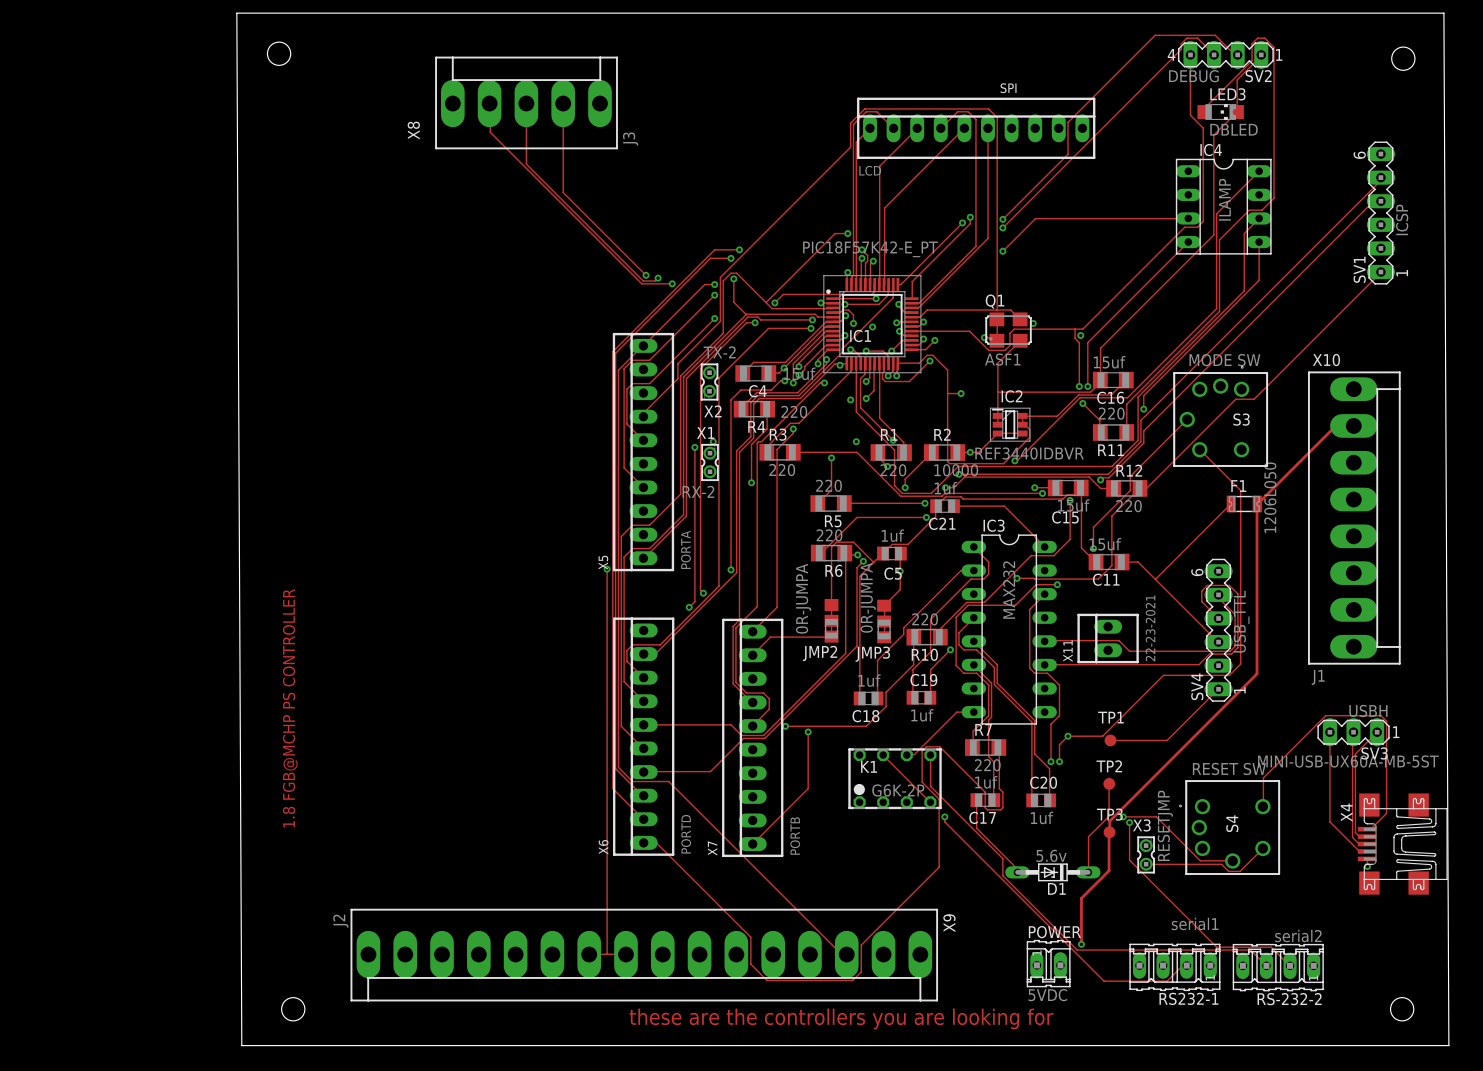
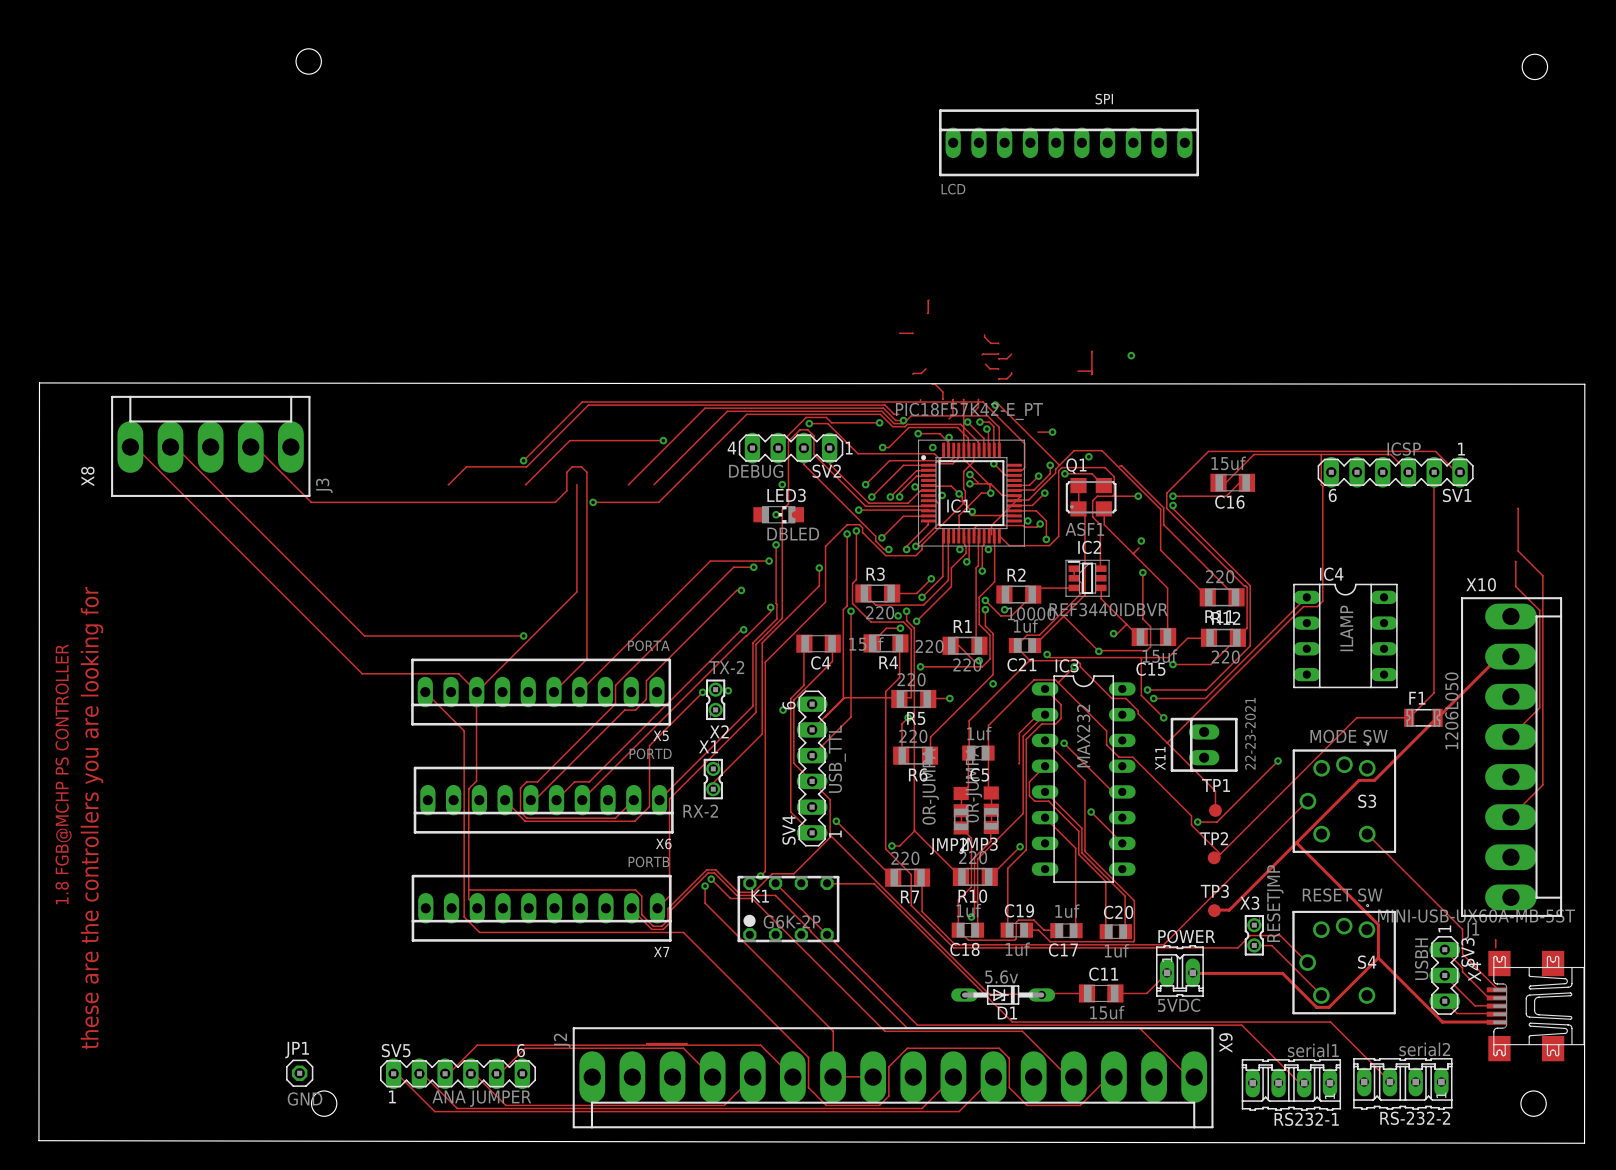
board edge: (236, 13) (1443, 13) (1448, 1045) (241, 1045) (236, 13) -> (39, 382) (38, 1140) (1584, 1143) (1584, 384) (39, 382)
track: (1190, 54) (1190, 115) (1203, 128) (1203, 221) (1197, 227) (1184, 227) (1082, 329) (1014, 329) (1009, 333) (1009, 345) (1004, 350) (988, 350) (969, 331) (911, 331) -> none
track: (1214, 54) (1197, 38) (1186, 38) (1181, 43) (1181, 49) (1002, 227) -> none
SV2 position: (1225, 54) -> (791, 448)
track: (1237, 54) (1234, 54) (1215, 35) (1155, 35) (1067, 122) (1067, 154) (1002, 219) -> none
track: (1261, 54) (1237, 79) (1237, 111) (1213, 135) (1213, 234) (1100, 348) (1099, 382) (1090, 392) (997, 392) -> none
X8 position: (526, 102) -> (210, 446)
track: (489, 103) (490, 132) (641, 283) (672, 283) -> none
track: (526, 103) (526, 164) (643, 280) (655, 280) (658, 278) -> none
track: (563, 103) (563, 192) (646, 275) -> none
track: (1204, 112) (1204, 108) (1252, 60) (1252, 43) (1257, 38) (1264, 38) (1274, 47) (1274, 198) (1261, 210) (1249, 210) (1219, 239) (1219, 311) (1126, 404) (1126, 432) -> none
LED3 position: (1220, 112) -> (778, 514)
track: (870, 128) (856, 142) (856, 284) -> none
track: (893, 128) (876, 111) (866, 111) (853, 124) (853, 275) (851, 284) -> none
track: (917, 128) (879, 166) (879, 284) -> none
track: (940, 128) (957, 111) (968, 111) (975, 119) (975, 246) (919, 302) (911, 303) -> none
track: (964, 128) (884, 208) (883, 284) -> none
track: (987, 128) (987, 238) (918, 307) (911, 307) -> none
SV1 footprint: [1366, 141, 1396, 285] -> [1317, 456, 1474, 488]
track: (1259, 171) (1216, 213) (1216, 308) (1127, 397) (1080, 397) (1014, 460) -> none
track: (1380, 177) (1380, 180) (1140, 420) (1140, 441) (1108, 474) (958, 474) -> none
track: (1380, 201) (1373, 201) (1143, 431) (1143, 443) (1109, 477) (1102, 477) (1100, 479) -> none
IC4 position: (1223, 206) -> (1345, 635)
track: (970, 217) (970, 223) (912, 281) (911, 298) -> none
via: (970, 217) -> none
track: (1188, 218) (1035, 218) (1002, 251) -> none
track: (1259, 218) (1244, 233) (1244, 290) (1138, 397) (1138, 440) (1111, 466) (958, 466) (931, 493) (902, 493) (894, 485) (894, 450) (856, 411) (856, 363) -> none
via: (1002, 219) -> none
SV1 value position: ICSP (1402, 219) -> ICSP (1404, 449)
track: (962, 222) (900, 284) (897, 284) -> none
via: (962, 222) -> none
via: (1002, 227) -> none
track: (847, 233) (835, 233) (766, 302) -> none
via: (847, 233) -> none
track: (1188, 242) (1087, 342) (1087, 386) -> none
track: (1259, 242) (1259, 280) (1143, 395) (1143, 409) -> none
track: (739, 249) (714, 249) (612, 351) (612, 788) (643, 819) -> none
via: (739, 249) -> none
track: (861, 249) (867, 255) (865, 263) (865, 284) -> none
via: (861, 249) -> none
via: (1002, 251) -> none
track: (731, 258) (710, 258) (615, 353) (615, 768) (643, 795) -> none
via: (731, 258) -> none
track: (861, 258) (860, 284) -> none
via: (861, 258) -> none
track: (873, 261) (870, 264) (870, 284) -> none
via: (873, 261) -> none
SV1 name position: SV1 (1359, 269) -> SV1 (1457, 495)
via: (847, 272) -> none
track: (1380, 272) (1254, 399) (1235, 399) (1146, 488) (1139, 488) (1111, 516) (1111, 565) (1098, 579) (1017, 578) -> none
via: (646, 275) -> none
via: (658, 278) -> none
track: (733, 278) (733, 302) (746, 314) -> none
via: (733, 278) -> none
via: (672, 283) -> none
track: (714, 284) (704, 284) (618, 370) (618, 767) (632, 781) (668, 781) (841, 954) (846, 954) -> none
via: (714, 284) -> none
track: (874, 284) (871, 294) (783, 294) (774, 302) -> none
track: (888, 284) (888, 295) (878, 304) (844, 304) -> none
track: (893, 284) (893, 297) (798, 395) (757, 395) (750, 402) (750, 436) (736, 450) (736, 572) (655, 654) (643, 654) -> none
track: (714, 295) (649, 360) (632, 360) (624, 368) (624, 467) (643, 487) -> none
via: (714, 295) -> none
track: (832, 298) (876, 298) -> none
via: (876, 298) -> none
via: (774, 302) -> none
via: (820, 302) -> none
via: (844, 304) -> none
via: (898, 304) -> none
track: (832, 307) (772, 308) (736, 273) (731, 273) (723, 280) (723, 333) (680, 375) (680, 494) (649, 525) (632, 525) (621, 536) (621, 726) (643, 748) -> none
track: (997, 310) (997, 117) (988, 108) (864, 108) (850, 123) (850, 147) (720, 277) (720, 321) (677, 363) (677, 378) (643, 412) (643, 416) -> none
track: (832, 312) (848, 310) (853, 314) (853, 323) -> none
track: (845, 315) (840, 321) (825, 322) (785, 362) (753, 362) (742, 373) -> none
via: (845, 315) -> none
track: (832, 317) (818, 317) (815, 314) (746, 314) (683, 377) (683, 514) (649, 548) (632, 548) (624, 557) (624, 681) (643, 701) -> none
track: (911, 317) (920, 317) (927, 310) (1010, 310) (1020, 319) -> none
track: (714, 318) (649, 383) (632, 383) (626, 389) (626, 424) (643, 440) -> none
via: (714, 318) -> none
track: (812, 319) (760, 319) (757, 317) (747, 317) (686, 378) (686, 516) (643, 558) -> none
via: (812, 319) -> none
track: (755, 322) (746, 322) (700, 368) (700, 590) (703, 593) -> none
via: (755, 322) -> none
via: (896, 322) -> none
via: (923, 322) -> none
via: (853, 323) -> none
IC1 position: (872, 324) -> (971, 493)
track: (832, 326) (825, 327) (779, 373) (768, 373) -> none
via: (872, 327) -> none
track: (811, 328) (768, 328) (718, 377) (718, 402) -> (928, 505) (865, 506) (813, 454) (813, 435) (807, 429) (800, 429) (788, 441)
via: (811, 328) -> none
track: (1075, 329) (1075, 338) (1079, 342) (1079, 386) -> none
Q1 position: (1008, 330) -> (1091, 497)
track: (832, 331) (825, 331) (793, 363) (793, 382) -> none
via: (899, 331) -> none
track: (832, 335) (825, 336) (798, 363) (798, 366) -> none
via: (844, 335) -> none
via: (1080, 335) -> none
via: (984, 337) -> none
via: (923, 339) -> none
track: (911, 340) (902, 340) (891, 351) -> none
track: (934, 340) (925, 349) (911, 349) -> none
via: (934, 340) -> none
track: (1020, 340) (997, 363) (997, 424) -> none
track: (832, 345) (825, 345) (798, 375) -> none
track: (832, 349) (827, 350) (818, 359) (818, 363) -> none
via: (850, 349) -> none
track: (866, 351) (883, 351) (888, 356) (888, 363) -> none
via: (866, 351) -> none
via: (891, 351) -> none
track: (826, 359) (826, 363) (797, 392) (756, 392) (741, 409) -> none
via: (826, 359) -> none
track: (929, 360) (909, 381) (885, 381) (882, 378) (883, 363) -> none
via: (929, 360) -> none
via: (818, 363) -> none
track: (846, 363) (835, 363) (800, 398) (759, 398) (753, 404) (753, 438) (739, 452) (739, 620) (733, 626) (733, 683) (752, 702) -> none
track: (851, 363) (851, 370) (798, 423) (790, 423) (767, 446) (766, 452) -> none
track: (865, 363) (864, 374) (860, 378) (860, 407) (885, 432) -> none
track: (874, 363) (874, 390) (866, 398) -> none
via: (840, 365) -> none
via: (798, 366) -> none
via: (784, 368) -> none
track: none -> (995, 405) (999, 405) (1059, 465)
via: none -> (995, 405)
C4 position: (755, 373) -> (818, 643)
via: (798, 375) -> none
via: (888, 375) -> none
track: (896, 375) (898, 363) (919, 363) (927, 355) (932, 355) (947, 370) (947, 461) (949, 463) (1003, 463) (1029, 437) (1029, 429) -> (1236, 597) (1163, 524) (1163, 507) (1127, 471)
via: (896, 375) -> none
track: none -> (898, 414) (894, 414) (884, 405) (588, 405) (526, 466) (466, 466) (448, 484)
track: (784, 380) (780, 380) (771, 390) (740, 390) (731, 399) (731, 569) -> none
via: (784, 380) -> none
C16 position: (1113, 380) -> (1232, 482)
track: (1126, 380) (1111, 394) (1078, 394) (1057, 416) (1022, 415) (1022, 424) -> none
via: (866, 381) -> none
X2 position: (709, 382) -> (715, 699)
via: (793, 382) -> none
track: (820, 382) (761, 441) (757, 443) (757, 606) (735, 627) (735, 682) (746, 693) (763, 693) (769, 698) (769, 709) (752, 726) -> (898, 420) (895, 420) (883, 408) (705, 408) (628, 484)
track: none -> (967, 422) (983, 438) (984, 450)
via: none -> (967, 422)
track: none -> (979, 422) (989, 422) (993, 426) (994, 450)
via: none -> (979, 422)
track: none -> (809, 423) (827, 423) (857, 453) (934, 453) (941, 460) (950, 460) (953, 457) (953, 450)
via: none -> (809, 423)
track: none -> (879, 422) (831, 422) (826, 417) (806, 417) (778, 445) (778, 448)
via: none -> (879, 422)
via: (1079, 386) -> none
via: (1087, 386) -> none
track: none -> (986, 429) (989, 450)
via: none -> (986, 429)
track: none -> (918, 433) (939, 433) (948, 442) (948, 450)
via: none -> (918, 433)
via: (850, 399) -> none
track: none -> (663, 440) (569, 440) (525, 484)
via: none -> (663, 440)
track: (1082, 403) (1099, 420) (1100, 432) -> none
via: (1082, 403) -> none
track: none -> (130, 447) (136, 447) (362, 673) (458, 673) (476, 692)
track: none -> (170, 447) (176, 447) (364, 635) (523, 635)
track: none -> (250, 447) (256, 447) (311, 502) (555, 502) (566, 490) (566, 472) (572, 466) (581, 466) (586, 472) (586, 659) (553, 692)
track: none -> (882, 447) (888, 447) (908, 427) (957, 427) (968, 438) (968, 450)
via: none -> (882, 447)
via: none -> (932, 447)
track: none -> (803, 448) (803, 464) (875, 536) (875, 540) (884, 549) (888, 549)
track: none -> (829, 448) (830, 464) (868, 503) (908, 503) (920, 490) (928, 490)
R4 position: (754, 409) -> (886, 643)
track: (767, 409) (767, 428) (751, 444) (751, 482) -> none
via: (1143, 409) -> none
track: none -> (958, 450) (958, 458) (952, 463) (939, 463) (936, 460) (889, 460) (865, 484)
track: none -> (974, 450) (973, 461) (963, 471) (965, 501) (922, 544) (922, 549) (915, 555) (885, 555) (862, 532) (862, 527) (859, 524) (847, 524) (825, 546) (825, 601) (765, 662) (765, 871) (760, 876)
track: none -> (979, 450) (978, 442) (960, 424) (907, 424) (905, 426) (892, 426) (880, 414) (746, 414) (658, 502) (593, 502)
track: none -> (999, 450) (999, 427) (987, 415) (911, 415) (903, 423) (894, 423) (881, 411) (727, 411) (654, 484)
track: none -> (1321, 454) (1322, 601) (1317, 606) (1303, 606) (1167, 742)
via: none -> (1088, 456)
S3 position: (1220, 416) -> (1344, 797)
track: none -> (523, 460) (582, 402) (983, 402) (1024, 443) (1024, 467) (1022, 469) (1014, 470)
via: none -> (523, 460)
track: (1187, 419) (1130, 476) (1130, 490) (1093, 527) (1093, 548) -> none
track: none -> (993, 463) (1005, 475) (1014, 475)
via: none -> (993, 463)
track: none -> (928, 465) (903, 465) (871, 496)
track: none -> (1050, 465) (1050, 473) (1034, 490) (1014, 490)
via: none -> (1050, 465)
IC2 position: (1010, 424) -> (1087, 578)
track: (1353, 425) (1335, 426) (1257, 504) (1257, 673) (1109, 821) (1109, 831) -> (1510, 656) (1498, 656) (1374, 780) (1359, 780) (1229, 910) (1214, 910)
track: (793, 428) (793, 433) (777, 449) (777, 607) (752, 631) -> none
via: (793, 428) -> none
track: none -> (928, 470) (916, 470) (890, 496)
track: none -> (1408, 472) (1390, 454) (1254, 454) (1226, 482) (1218, 482)
track: none -> (1459, 472) (1456, 472) (1435, 451) (1208, 451) (1166, 493) (1166, 508) (1247, 587) (1247, 628) (1210, 664) (1172, 664)
track: none -> (1064, 473) (1091, 473) (1103, 485)
via: none -> (1064, 473)
via: none -> (969, 474)
R11 position: (1113, 432) -> (1222, 597)
track: none -> (928, 475) (916, 476) (899, 493) (899, 496)
track: none -> (1038, 476) (1029, 485) (1014, 485)
via: none -> (1038, 476)
track: (1022, 433) (997, 433) (978, 452) (957, 452) -> none
track: none -> (969, 483) (990, 483) (1002, 495) (1014, 495)
via: none -> (969, 483)
via: (893, 440) -> none
track: none -> (1246, 482) (1239, 483) (1226, 496) (1172, 496)
track: none -> (576, 484) (576, 591) (476, 692) (476, 781) (468, 788) (468, 899) (477, 908)
via: none -> (865, 484)
via: (856, 441) -> none
track: none -> (928, 485) (951, 486) (959, 493)
track: none -> (1078, 485) (1078, 508) (1084, 515) (1084, 595) (1034, 645)
via: none -> (915, 486)
track: (694, 447) (694, 586) -> (819, 568) (819, 585) (762, 642)
via: (694, 447) -> none
track: none -> (990, 493) (981, 493) (959, 515) (958, 536)
via: none -> (990, 493)
track: none -> (1044, 493) (1032, 505) (1014, 505)
via: none -> (1044, 493)
track: (1199, 449) (1240, 490) (1240, 664) (1229, 675) (1163, 675) (1102, 736) (1067, 736) (1059, 744) (1059, 761) -> none
via: none -> (959, 493)
via: none -> (942, 495)
track: none -> (1113, 495) (1138, 496)
X5 rotation: 0° (643, 452) -> 90° counterclockwise (541, 692)
X5 position: (643, 452) -> (541, 692)
R3 position: (780, 452) -> (877, 593)
track: (793, 452) (857, 452) (900, 496) (941, 496) (944, 493) (1042, 493) -> none
R1 position: (891, 452) -> (965, 645)
R2 position: (944, 452) -> (1018, 594)
via: (970, 452) -> none
via: none -> (1138, 496)
via: none -> (1172, 496)
via: none -> (871, 496)
via: none -> (890, 496)
via: none -> (899, 496)
track: none -> (928, 500) (935, 500) (939, 503) (939, 523) (915, 546)
track: none -> (1014, 500) (1028, 500) (1055, 473) (1055, 469) (1074, 450) (1101, 450) (1160, 509) (1160, 550) (1207, 597)
via: none -> (593, 502)
track: (831, 457) (831, 489) (817, 503) -> none
via: (831, 457) -> none
track: (718, 459) (718, 586) (660, 644) (632, 644) (626, 650) (626, 661) (643, 677) -> (788, 503) (782, 510) (782, 618) (756, 644) (756, 712) (669, 798) (669, 896) (657, 908)
via: (1014, 460) -> none
track: none -> (1172, 505) (1172, 508) (1250, 585) (1250, 645) (1206, 690) (1147, 690)
via: none -> (1172, 505)
X1 position: (710, 462) -> (713, 779)
track: none -> (1103, 508) (1104, 524) (1167, 588) (1168, 636)
track: none -> (1517, 508) (1518, 551) (1542, 575) (1542, 784) (1510, 817)
track: none -> (858, 510) (928, 510)
via: none -> (858, 510)
track: none -> (1014, 510) (1036, 510) (1046, 520) (1046, 539)
track: none -> (969, 513) (1014, 515)
via: none -> (776, 514)
track: none -> (928, 515) (903, 516) (881, 537)
via: none -> (1027, 520)
via: (958, 474) -> none
track: none -> (928, 520) (928, 524) (906, 546) (906, 549)
track: none -> (1040, 524) (1037, 527) (976, 525) (974, 527) (974, 536)
via: none -> (1040, 524)
via: (1100, 479) -> none
via: (751, 482) -> none
via: none -> (856, 530)
track: none -> (847, 534) (847, 605) (843, 609) (843, 698) (812, 729)
via: none -> (847, 534)
via: (905, 487) -> none
track: (945, 487) (954, 487) (964, 477) (1089, 477) (1100, 488) (1113, 488) -> none
via: (945, 487) -> none
track: (1034, 487) (1055, 487) -> none
via: (1034, 487) -> none
C15 position: (1068, 487) -> (1153, 636)
track: none -> (943, 536) (942, 576) (922, 597)
track: none -> (948, 536) (948, 580) (923, 605) (875, 605) (863, 593)
track: none -> (963, 536) (966, 553) (951, 568) (951, 586) (916, 621)
track: none -> (968, 536) (969, 559) (966, 561)
track: none -> (979, 536) (978, 565) (976, 568) (976, 642) (979, 645)
track: none -> (984, 536) (982, 571)
track: none -> (994, 536) (994, 581) (979, 597) (979, 624) (989, 635) (989, 659) (982, 666) (920, 666)
track: none -> (999, 536) (1009, 545) (1049, 545) (1058, 536) (1058, 470) (1061, 467) (1105, 467) (1114, 476) (1114, 494) (1097, 496) (1092, 500) (1092, 517) (1100, 524) (1101, 568)
R12 position: (1126, 488) -> (1223, 637)
via: none -> (881, 537)
via: none -> (1046, 539)
track: none -> (776, 544) (776, 618) (752, 642) (752, 706) (659, 800)
via: none -> (776, 544)
via: none -> (915, 546)
track: none -> (1139, 547) (1133, 553)
track: (1070, 500) (1070, 539) (1053, 555) (1031, 555) (984, 602) (966, 602) (940, 628) (940, 637) -> none
via: (1070, 500) -> none
via: none -> (888, 549)
via: none -> (906, 549)
via: none -> (959, 549)
via: none -> (988, 549)
R5 position: (831, 503) -> (913, 699)
track: (924, 503) (844, 503) -> none
via: (924, 503) -> none
track: (1231, 504) (1155, 579) -> none
F1 position: (1244, 504) -> (1423, 717)
C21 position: (945, 506) -> (1025, 645)
track: (953, 506) (1004, 506) (1044, 546) -> none
track: none -> (769, 561) (710, 561) (579, 692)
via: none -> (769, 561)
via: none -> (966, 561)
track: none -> (1515, 561) (1515, 586) (1539, 610) (1539, 707) (1510, 736)
track: none -> (753, 567) (733, 567) (615, 685) (615, 703) (537, 781) (526, 781) (520, 788) (520, 812) (526, 818) (615, 818) (633, 800)
via: none -> (753, 567)
track: (926, 517) (857, 517) (821, 552) (818, 553) -> none
via: (926, 517) -> none
via: none -> (819, 568)
X10 position: (1354, 518) -> (1511, 757)
via: none -> (982, 571)
track: none -> (1142, 572) (1142, 618) (1150, 626) (1150, 646) (1146, 650) (1098, 651) (1063, 616)
via: none -> (1142, 572)
track: none -> (931, 578) (916, 593) (892, 593)
via: none -> (931, 578)
track: none -> (1073, 587) (1039, 588) (1011, 615) (1000, 615) (985, 600)
track: none -> (1101, 588) (1101, 598) (1139, 636)
track: none -> (741, 590) (736, 590) (646, 680) (646, 699) (635, 710) (624, 710) (535, 799) (530, 800)
via: none -> (741, 590)
C11 value position: 15uf (1105, 544) -> 15uf (1107, 1012)
via: none -> (922, 597)
track: none -> (1306, 597) (1205, 698) (1153, 698)
track: (973, 546) (988, 562) (988, 574) (983, 579) (971, 579) (930, 619) (930, 651) (912, 669) (912, 697) -> none
via: none -> (985, 600)
via: (1093, 548) -> none
R6 position: (831, 553) -> (915, 755)
C5 position: (891, 553) -> (978, 753)
track: (900, 553) (900, 589) (884, 605) (884, 637) -> none
track: none -> (770, 607) (770, 612) (582, 800)
via: none -> (770, 607)
track: (857, 554) (846, 554) (844, 553) (845, 653) (763, 735) (741, 735) (731, 724) (643, 724) -> none
via: (857, 554) -> none
track: none -> (985, 609) (985, 625) (993, 633) (993, 674) (930, 737) (930, 755)
via: none -> (985, 609)
via: none -> (1004, 609)
track: none -> (851, 611) (851, 717) (812, 755)
via: none -> (851, 611)
track: none -> (906, 611) (906, 620) (914, 628) (914, 830) (960, 876)
via: none -> (906, 611)
track: (863, 561) (857, 567) (857, 646) (764, 738) (743, 738) (710, 771) (643, 772) -> none
via: (863, 561) -> none
via: none -> (898, 615)
track: (873, 562) (853, 542) (836, 542) (831, 547) (831, 574) -> (856, 530) (856, 579) (852, 583) (852, 603) (871, 622) (903, 622) (911, 629)
track: (1096, 562) (1081, 547) (1081, 488) (1081, 487) (1081, 494) (1067, 494) (1063, 499) (963, 499) (961, 496) (945, 496) (935, 506) (935, 516) (907, 544) (892, 544) (859, 576) (859, 698) -> none
C11 position: (1109, 562) -> (1101, 993)
track: (1122, 562) (1138, 562) (1218, 642) -> none
via: none -> (916, 621)
track: (607, 569) (607, 954) -> none
via: (607, 569) -> none
via: (731, 569) -> none
track: none -> (1126, 624) (1114, 636)
track: (973, 570) (961, 570) (903, 627) (903, 634) (877, 660) (877, 698) -> none
via: (900, 571) -> none
track: none -> (900, 628) (886, 628) (871, 643)
via: none -> (900, 628)
track: none -> (743, 629) (741, 629) (589, 781) (574, 781) (556, 800)
via: none -> (743, 629)
C11 name position: C11 (1106, 579) -> C11 (1103, 974)
via: none -> (523, 635)
track: none -> (1209, 637) (1187, 638) (1168, 657) (1050, 657) (1047, 654)
track: (1057, 584) (1036, 584) (1015, 605) (968, 605) (956, 617) (956, 665) (963, 673) (976, 673) (988, 685) (988, 715) (973, 731) (972, 747) -> none
via: (1057, 584) -> none
track: none -> (804, 643) (803, 685) (790, 698) (790, 812) (812, 832)
track: none -> (832, 643) (832, 661) (793, 700) (793, 763) (830, 799) (830, 835) (989, 994) (1087, 993)
track: none -> (900, 643) (899, 677) (885, 691) (885, 801)
track: none -> (950, 645) (959, 645) (973, 660) (979, 660)
via: (703, 593) -> none
via: none -> (1098, 651)
track: (1044, 594) (1029, 609) (1029, 668) (1034, 673) (1047, 673) (1059, 685) (1059, 715) (1051, 724) (1051, 761) -> none
track: (1218, 594) (1218, 598) (1235, 614) (1235, 646) (1230, 651) (1129, 651) (1118, 640) (1044, 641) -> none
via: none -> (1047, 654)
track: none -> (1141, 657) (1141, 695) (1163, 717)
track: (694, 601) (689, 607) -> (762, 659) (762, 734) (713, 782) (713, 789)
track: none -> (1029, 660) (969, 720) (968, 786) (961, 793) (961, 827) (971, 838) (971, 886) (958, 900) (958, 930) (968, 940) (1014, 940) (1016, 922) (1018, 920) (1034, 920) (1044, 930) (1056, 930)
via: none -> (979, 660)
via: none -> (1172, 664)
via: (689, 607) -> none
via: none -> (920, 666)
track: none -> (1074, 666) (1058, 682)
via: none -> (1074, 666)
track: (973, 617) (958, 632) (958, 644) (963, 649) (976, 649) (994, 667) (994, 684) (1031, 722) (1032, 800) -> none
track: (1218, 618) (1201, 601) (1201, 591) (1207, 585) (1229, 585) (1237, 593) (1237, 647) (1231, 654) (1209, 654) (1198, 664) (1044, 664) -> none
JMP2 position: (831, 620) -> (961, 810)
JMP3 position: (884, 621) -> (991, 810)
via: none -> (993, 683)
track: none -> (1045, 688) (1061, 704) (1061, 718) (1055, 723) (1041, 723) (1026, 739) (1026, 849) (1007, 868) (1007, 930)
IC3 position: (1009, 629) -> (1083, 779)
via: none -> (728, 690)
via: none -> (1147, 690)
SV4 position: (1218, 630) -> (812, 768)
track: none -> (425, 692) (464, 730) (464, 917) (479, 932) (683, 932) (808, 1057) (808, 1087) (826, 1105) (879, 1105) (888, 1096) (888, 1066) (907, 1048) (999, 1048) (1009, 1058) (1009, 1087) (1027, 1105) (1080, 1105) (1108, 1077) (1113, 1077)
track: none -> (702, 692) (649, 745) (649, 806) (634, 821) (525, 821) (505, 800)
via: none -> (702, 692)
track: none -> (949, 698) (928, 699)
via: none -> (949, 698)
track: (913, 637) (913, 664) (886, 692) (886, 706) (866, 726) (785, 726) -> none
R10 position: (927, 637) -> (975, 876)
via: none -> (1153, 698)
X11 position: (1108, 638) -> (1204, 744)
track: (973, 641) (997, 664) (997, 683) (1034, 720) (1034, 753) (1049, 768) (1049, 800) -> none
via: none -> (783, 710)
via: (950, 649) -> none
track: none -> (1045, 714) (1023, 736) (1023, 813) (977, 859) (977, 930)
track: none -> (908, 717) (901, 723) (901, 755)
via: none -> (908, 717)
via: none -> (1163, 717)
track: (973, 664) (991, 683) (988, 756) (993, 761) (994, 800) -> none
track: none -> (1045, 740) (1084, 780) (1084, 851) (1134, 900) (1134, 940) (1050, 941) (1038, 930) (1026, 930)
track: none -> (1064, 743) (1112, 791) (1122, 791)
via: none -> (1064, 743)
track: (1218, 689) (1167, 740) (1110, 740) -> (1074, 568) (1073, 578) (1076, 578) (1081, 583) (1081, 592) (1039, 635) (1027, 635) (1015, 645) (1030, 660) (1077, 660) (1080, 666) (1111, 698) (1125, 698) (1138, 710) (1138, 713) (1215, 791) (1215, 810)
track: none -> (1278, 761) (1217, 822) (1197, 822)
via: none -> (1278, 761)
C19 position: (921, 697) -> (1016, 930)
C18 position: (868, 698) -> (967, 930)
track: none -> (1045, 766) (1029, 781) (1029, 795) (1034, 801) (1048, 801) (1078, 831) (1078, 854) (1105, 881) (1106, 931)
text: none -> 1.8 FGB@MCHP PS CONTROLLER (63, 774)
text: 1.8 FGB@MCHP PS CONTROLLER (290, 708) -> none
track: (973, 712) (956, 712) (914, 754) (906, 755) -> none
track: none -> (1045, 791) (1081, 828) (1081, 852) (1125, 896) (1125, 931)
via: (785, 726) -> none
R7 name position: R7 (983, 729) -> R7 (910, 896)
via: (808, 731) -> none
track: none -> (1307, 801) (1163, 944) (955, 944) (922, 911) (922, 877)
track: (1329, 732) (1329, 821) (1358, 850) (1367, 851) -> none
track: (1353, 732) (1352, 837) (1358, 843) (1367, 844) -> none
SV3 rotation: 0° (1353, 732) -> 90° counterclockwise (1444, 975)
SV3 position: (1353, 732) -> (1444, 975)
track: (1377, 732) (1355, 753) (1355, 832) (1358, 836) (1367, 836) -> none
X6 rotation: 0° (643, 736) -> 90° counterclockwise (543, 800)
X6 position: (643, 736) -> (543, 800)
via: (1067, 736) -> none
X7 rotation: 0° (752, 737) -> 90° counterclockwise (541, 908)
X7 position: (752, 737) -> (541, 908)
track: none -> (1091, 812) (1122, 843)
via: none -> (1091, 812)
text: none -> these are the controllers you are looking for (92, 818)
track: none -> (1045, 817) (1075, 848) (1076, 930)
R7 position: (985, 747) -> (907, 877)
track: (998, 747) (999, 788) (1002, 792) (1002, 807) (1000, 809) (987, 809) (985, 807) (985, 792) (939, 746) (926, 746) (922, 751) (922, 782) (939, 799) (939, 867) (861, 945) (861, 971) (852, 980) (767, 980) (750, 964) (750, 937) (656, 843) (643, 842) -> none
track: none -> (836, 821) (893, 877)
via: none -> (836, 821)
via: none -> (1197, 822)
track: (883, 755) (930, 802) -> none
track: (930, 755) (930, 786) (1002, 858) (1002, 875) (1077, 950) (1250, 950) (1266, 965) -> none
track: none -> (914, 830) (899, 845) (891, 845)
via: (1051, 761) -> none
via: (1059, 761) -> none
track: none -> (1367, 834) (1462, 929) (1462, 954) (1496, 989)
track: none -> (831, 836) (793, 873) (772, 873) (753, 892) (738, 892) (715, 869) (706, 869) (668, 908) (668, 920) (661, 926) (653, 926) (641, 914) (641, 896) (635, 889) (468, 889)
R7 value position: 220 (987, 765) -> 220 (905, 858)
track: none -> (1296, 842) (1378, 924) (1378, 957)
via: none -> (891, 845)
track: none -> (1020, 846) (989, 876)
via: none -> (1020, 846)
track: (808, 775) (808, 788) (752, 844) -> (885, 849) (911, 874) (911, 905) (953, 947) (1237, 947) (1250, 935) (1280, 935) (1307, 962)
K1 position: (895, 778) -> (788, 909)
track: none -> (1220, 854) (1191, 825) (1191, 815) (1132, 757) (1118, 757) (1106, 744) (1106, 730) (1055, 679) (1034, 679) (988, 725) (988, 790) (991, 793) (990, 841) (974, 857) (974, 913) (971, 917)
track: (1109, 783) (1109, 816) (1088, 836) (1088, 872) -> (1214, 857) (1217, 857) (1356, 717) (1409, 717) (1433, 693) (1434, 472)
via: none -> (760, 876)
track: (976, 800) (976, 828) (1017, 868) (1017, 872) -> none
C17 position: (985, 800) -> (1066, 930)
C20 position: (1041, 800) -> (1115, 931)
track: none -> (711, 879) (730, 898) (752, 898) (884, 1031) (1022, 1031) (1067, 1076) (1073, 1077)
via: none -> (711, 879)
track: (1262, 806) (1263, 777) (1325, 715) (1380, 715) (1386, 721) (1386, 813) (1371, 828) (1367, 829) -> none
track: none -> (775, 883) (917, 1025) (1241, 1025) (1299, 1083) (1304, 1083)
track: none -> (827, 883) (874, 883) (1012, 1022) (1330, 1022) (1389, 1082)
track: none -> (705, 886) (705, 903) (833, 1031) (833, 1077) (873, 1077)
via: none -> (705, 886)
track: (944, 816) (944, 821) (1104, 981) (1167, 981) (1182, 965) (1186, 965) -> none
via: (944, 816) -> none
track: (1123, 816) (1156, 816) (1200, 860) (1232, 860) -> none
via: (1123, 816) -> none
track: (1129, 822) (1129, 860) (1216, 947) (1271, 947) (1290, 965) -> none
via: (1129, 822) -> none
S4 rotation: 0° (1229, 827) -> 90° clockwise (1344, 959)
track: none -> (631, 908) (651, 929) (663, 929) (671, 921) (671, 910) (708, 873) (714, 873) (736, 895) (775, 895) (907, 1028) (1139, 1028) (1188, 1076) (1194, 1077)
track: (1109, 832) (1109, 870) (1081, 898) (1081, 944) -> none
via: none -> (971, 917)
X4 position: (1402, 844) -> (1535, 1006)
track: (1262, 848) (1240, 871) (1228, 871) (1221, 864) (1162, 864) -> (1321, 995) (1271, 945)
via: (1367, 866) -> none
track: none -> (1444, 949) (1462, 967) (1462, 971) (1488, 997) (1496, 997)
D1 position: (1052, 872) -> (1003, 995)
track: none -> (1378, 957) (1442, 1022) (1496, 1022)
track: none -> (1378, 957) (1328, 1007) (1316, 1007) (1282, 973) (1192, 972)
track: none -> (1167, 972) (1146, 993) (1115, 993)
track: none -> (1444, 975) (1474, 1005) (1496, 1006)
track: none -> (1444, 1001) (1457, 1013) (1496, 1014)
RS232-1 value position: serial1 (1195, 923) -> serial1 (1313, 1050)
via: (1081, 944) -> none
X9 position: (644, 955) -> (893, 1077)
POWER position: (1048, 963) -> (1179, 970)
RS232-1 position: (1174, 967) -> (1291, 1084)
RS-232-2 position: (1278, 967) -> (1402, 1083)
JP1: none -> GND (299, 1073)
track: none -> (393, 1073) (396, 1073) (434, 1111) (959, 1111) (993, 1077)
track: none -> (419, 1073) (422, 1073) (457, 1108) (922, 1108) (953, 1077)
track: none -> (445, 1073) (448, 1073) (477, 1045) (760, 1045) (792, 1077)
SV5: none -> ANA JUMPER (457, 1073)
track: none -> (470, 1073) (474, 1073) (505, 1105) (724, 1105) (752, 1077)
track: none -> (496, 1073) (499, 1073) (525, 1048) (683, 1048) (712, 1077)
text: these are the controllers you are looking for (841, 1018) -> none

